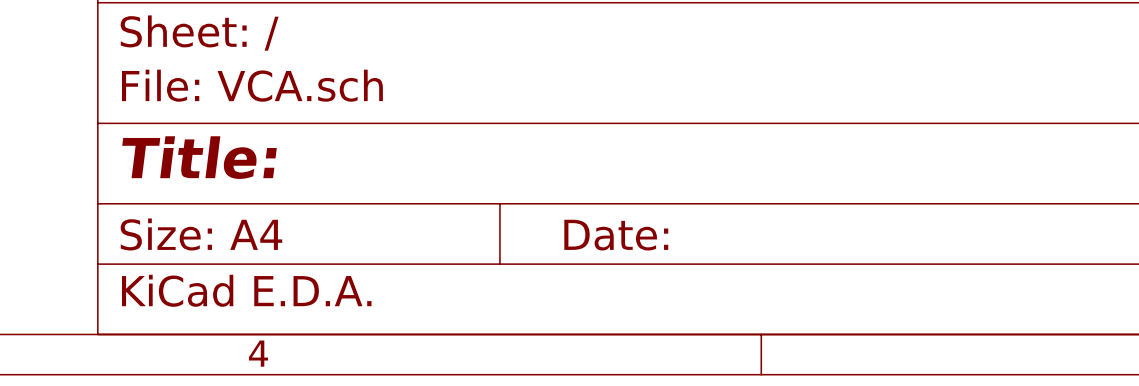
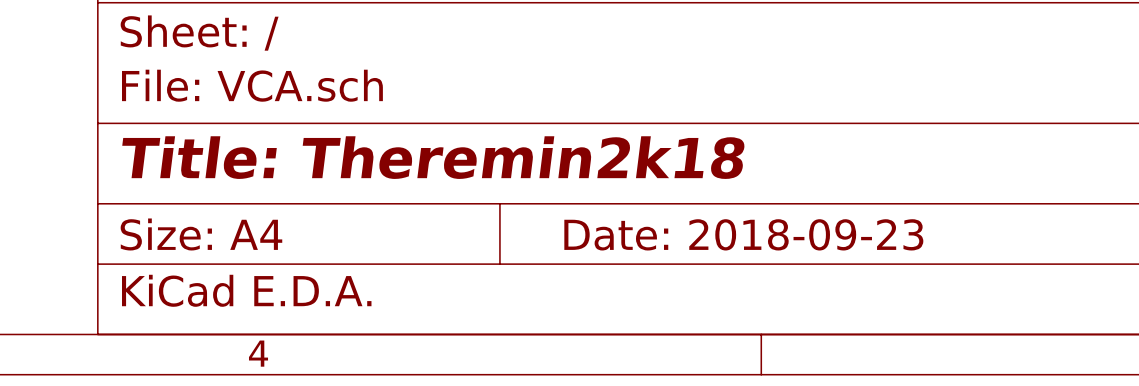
title block: Title: (199, 157) -> Title: Theremin2k18 (433, 157)
title block: Date: (616, 235) -> Date: 2018-09-23 (743, 234)

